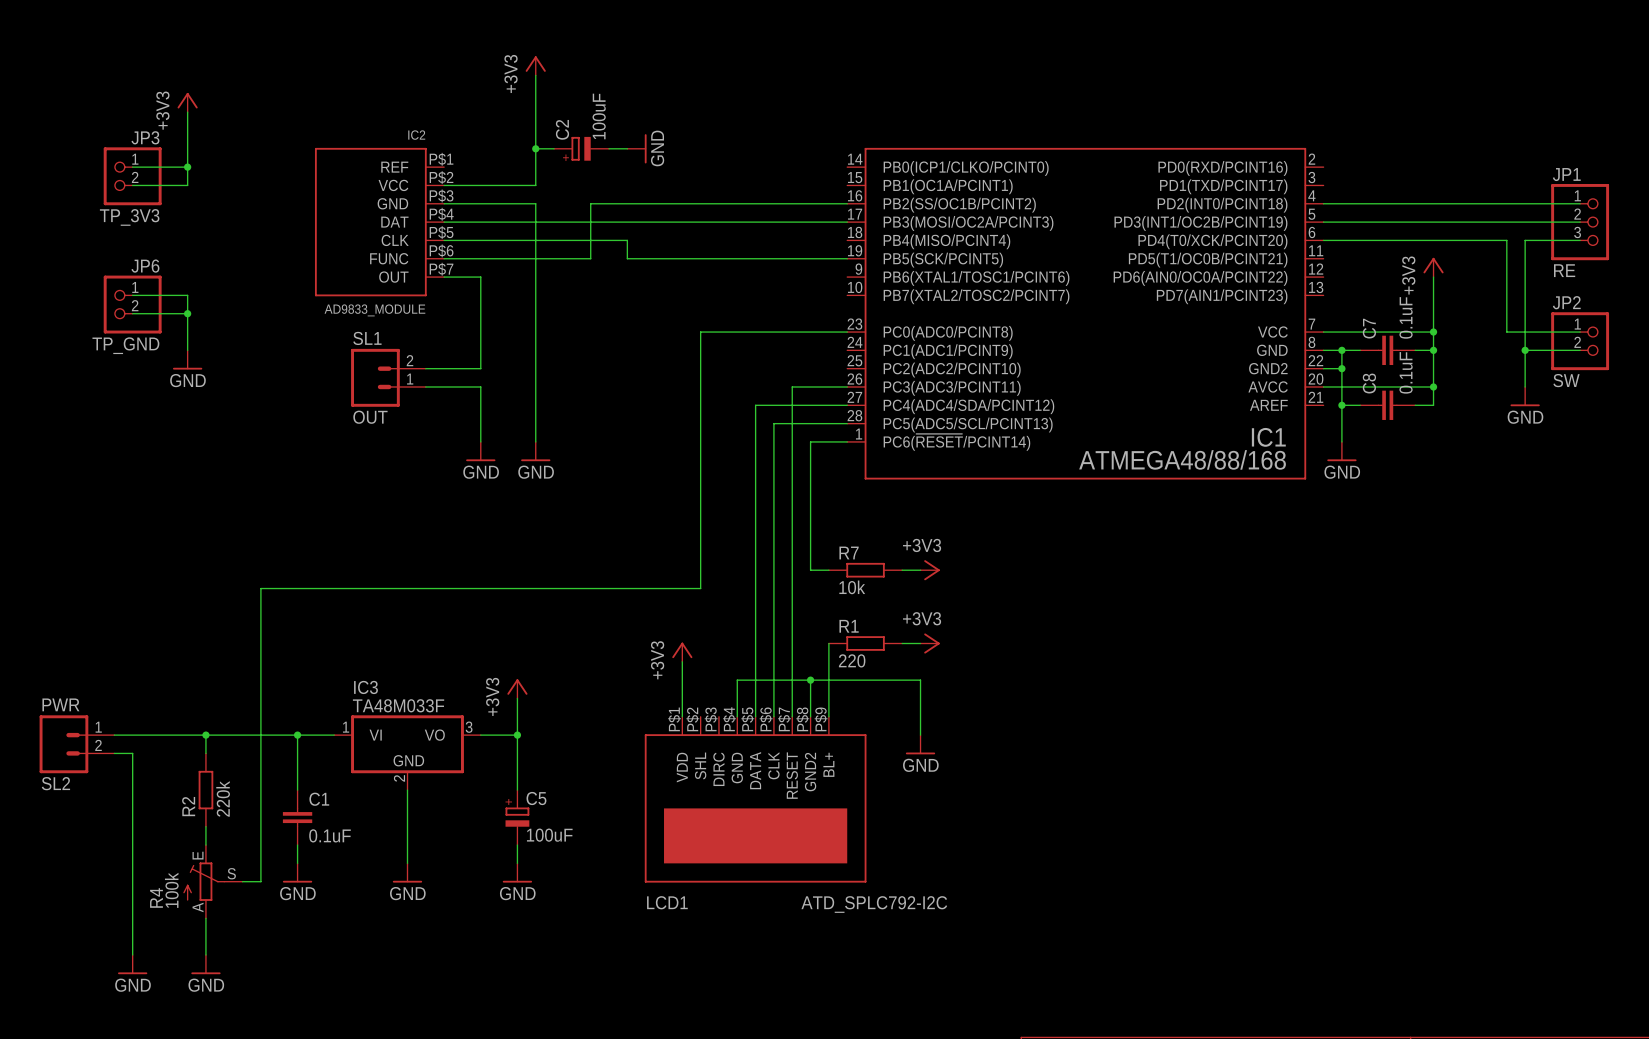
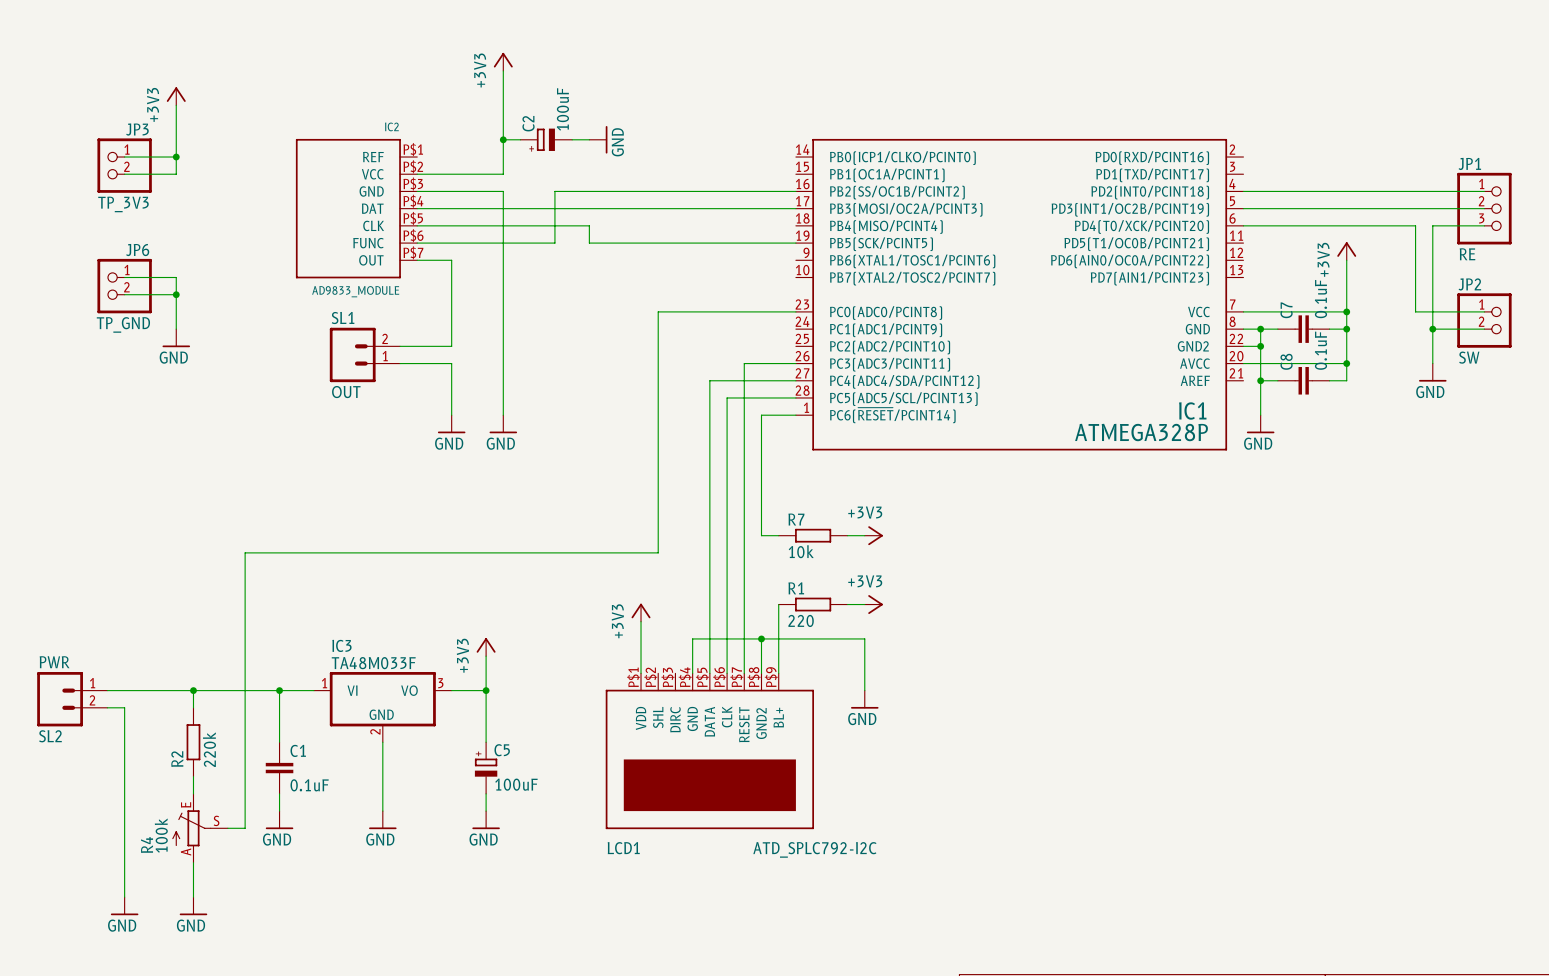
IC1 value: ATMEGA48/88/168 (1182, 459) -> ATMEGA328P (1141, 432)

